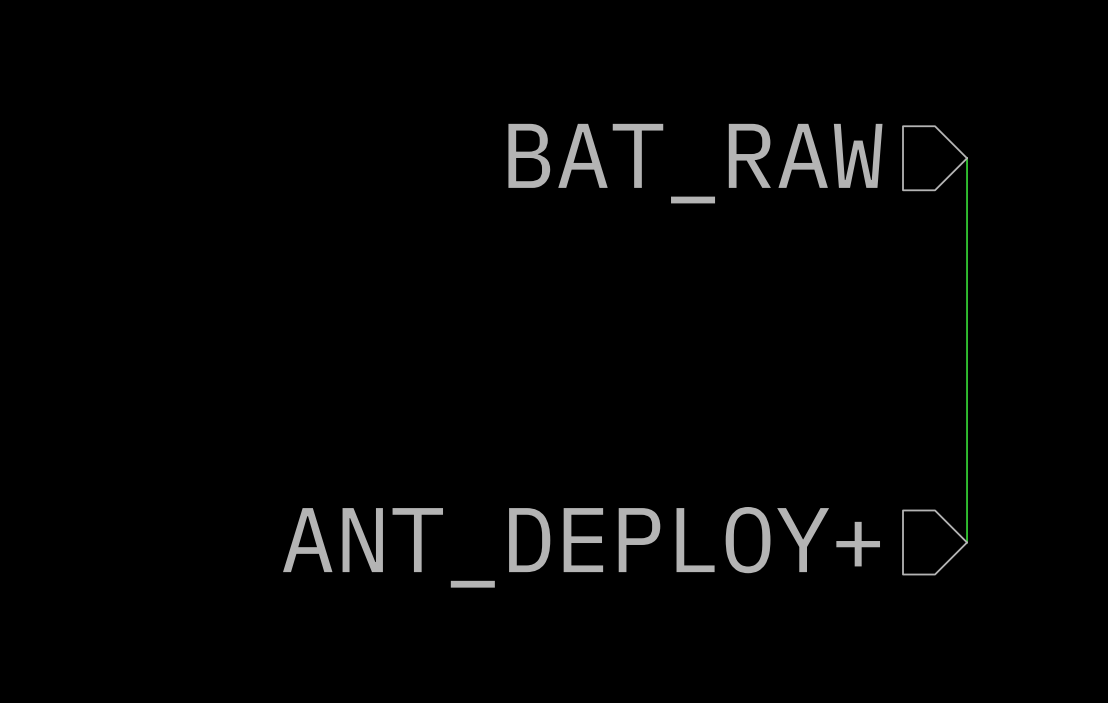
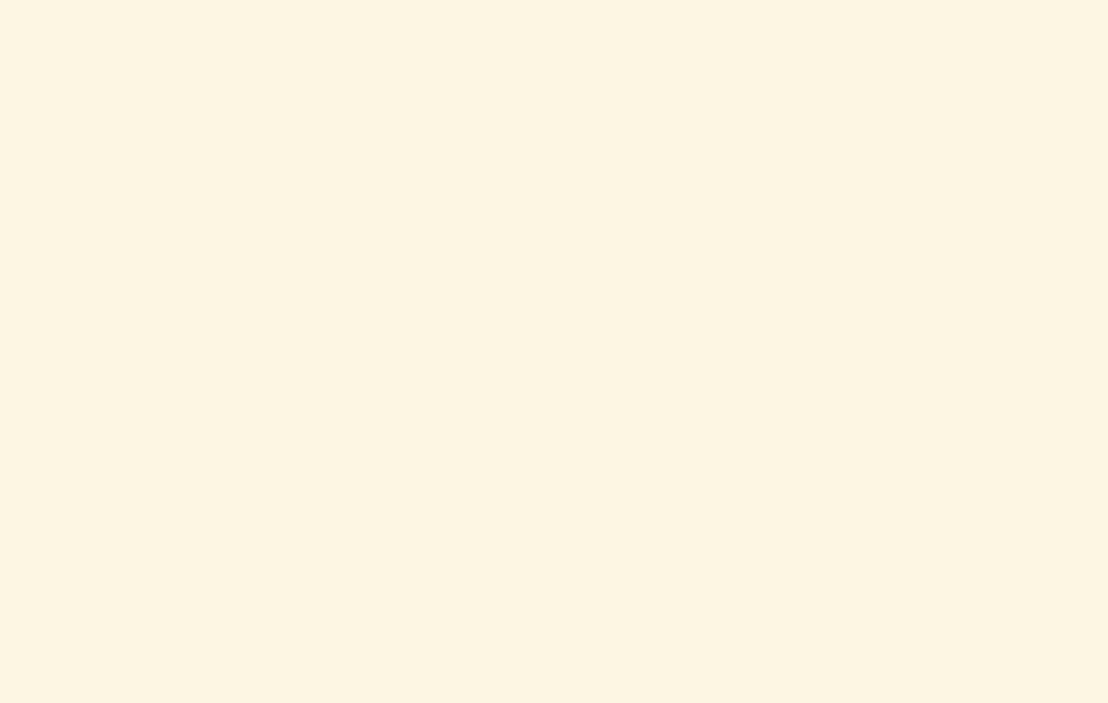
wire: (967, 158) (967, 542) -> none
hierarchical label: BAT_RAW (695, 163) -> none
hierarchical label: ANT_DEPLOY+ (581, 547) -> none

